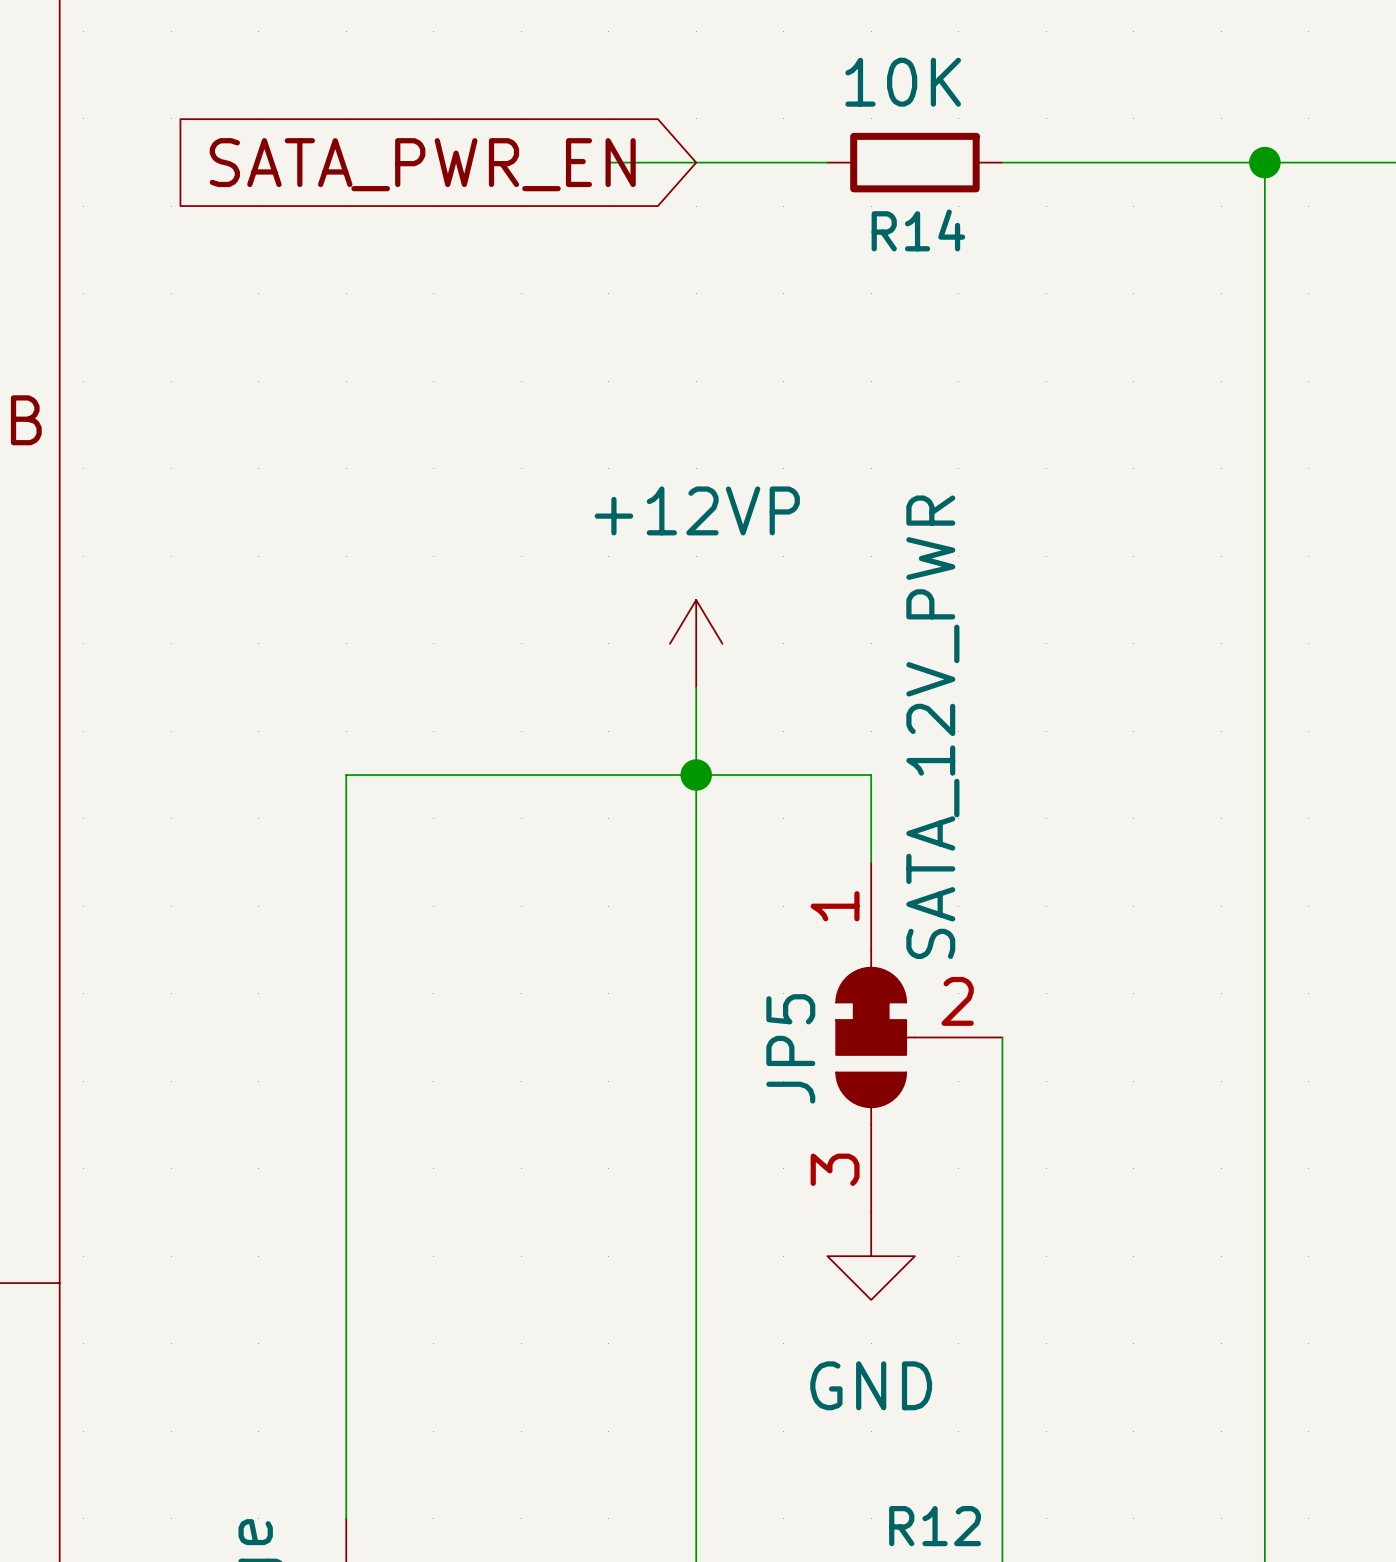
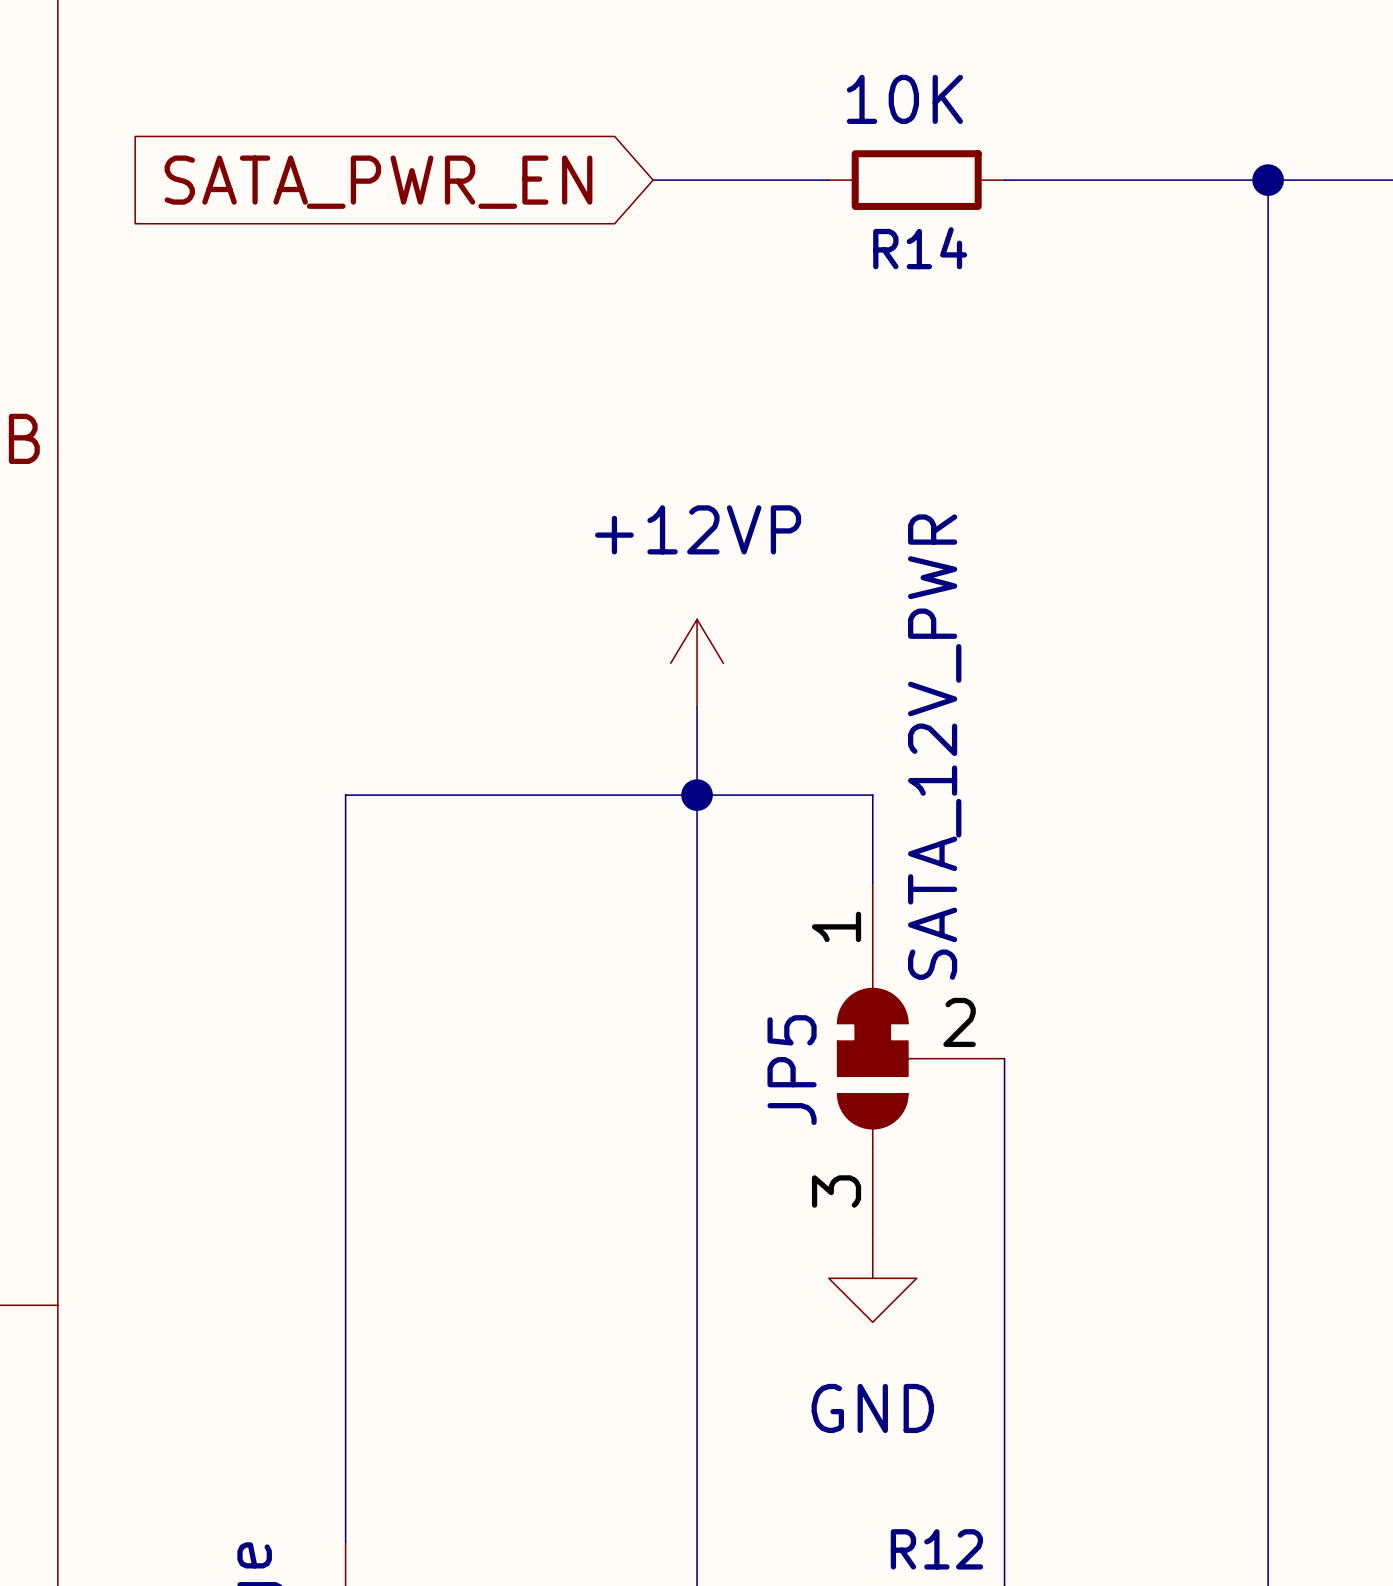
wire: (608, 162) (652, 162) -> none
global label position: SATA_PWR_EN (422, 164) -> SATA_PWR_EN (378, 182)

